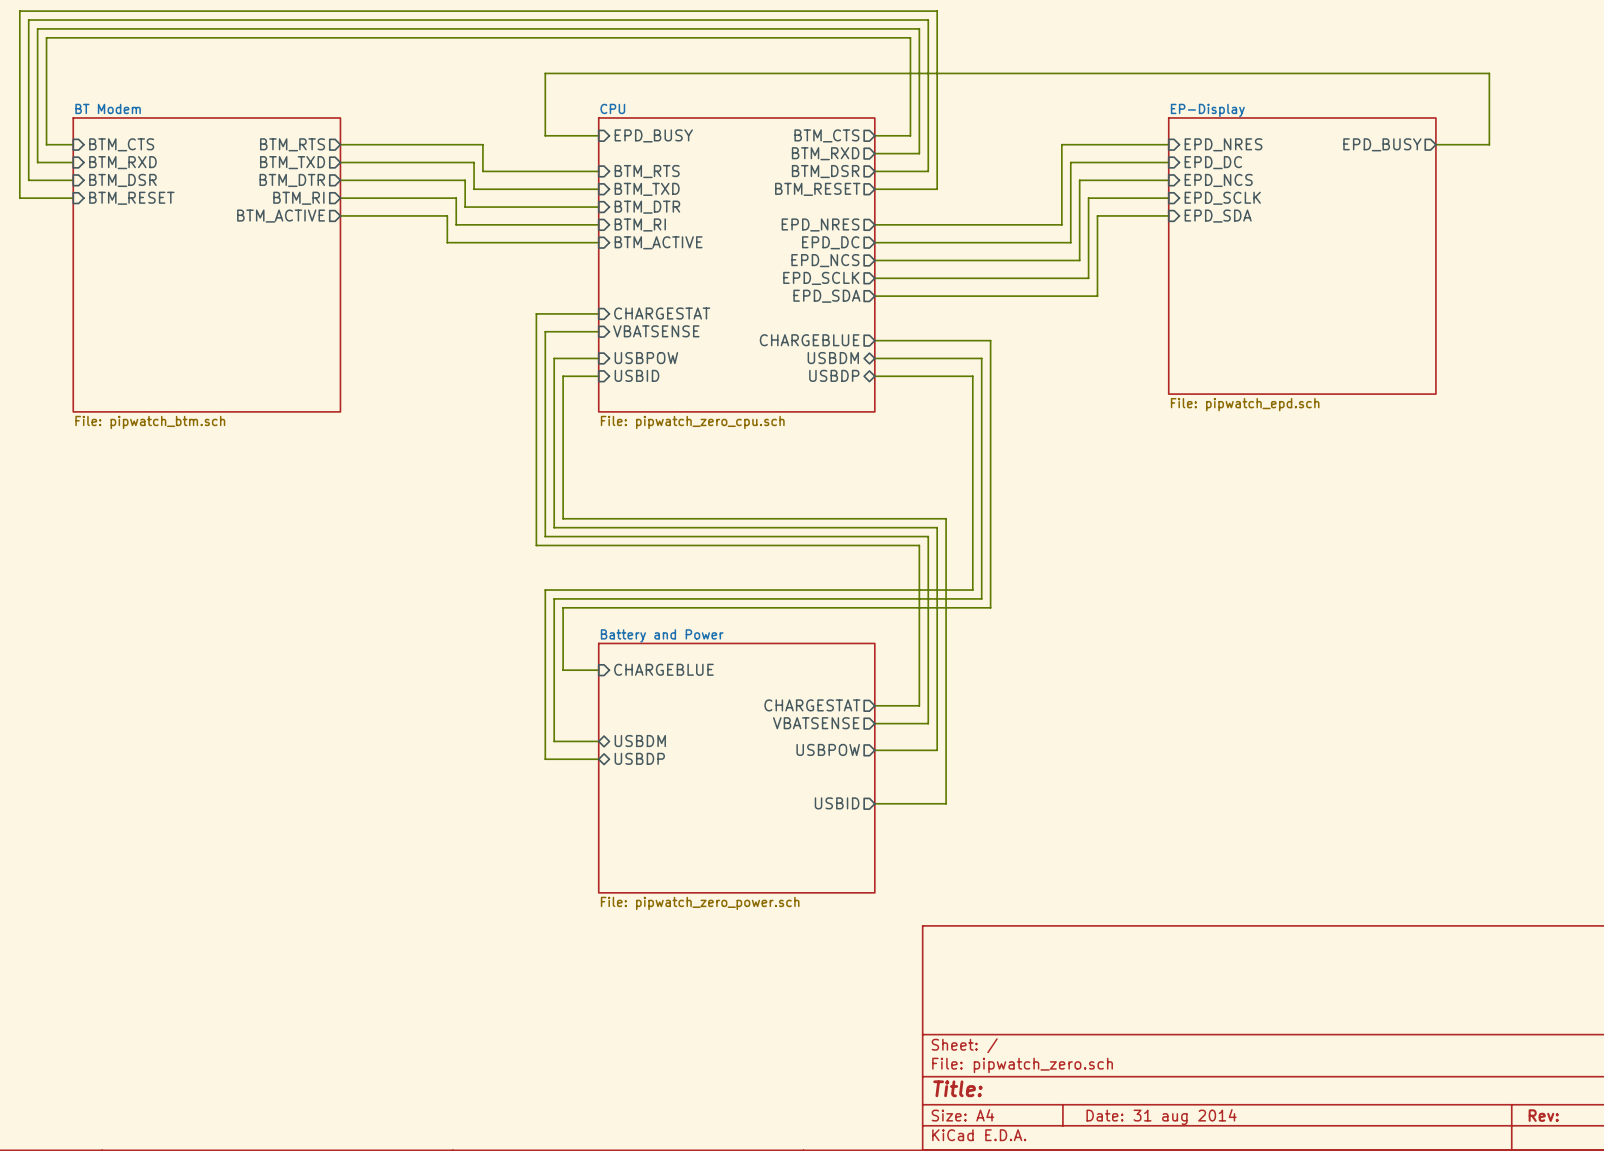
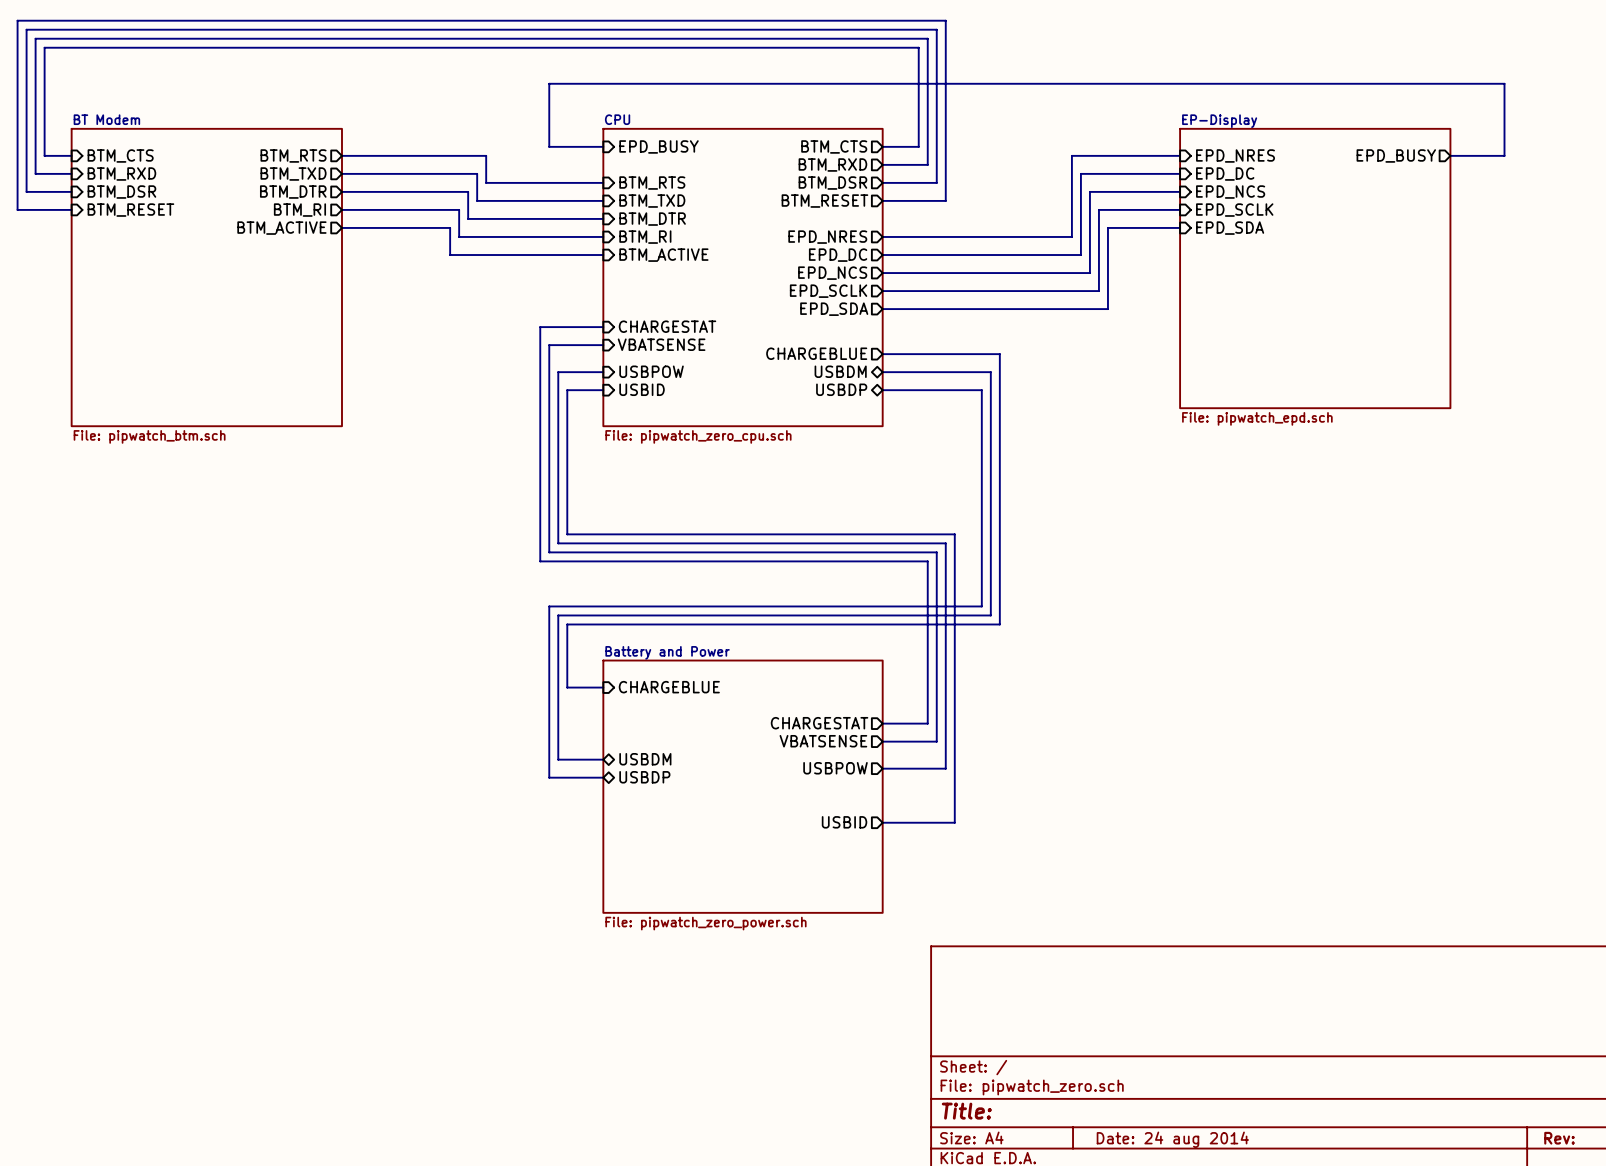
title block: Date: 31 aug 2014 (1161, 1117) -> Date: 24 aug 2014 (1172, 1139)

